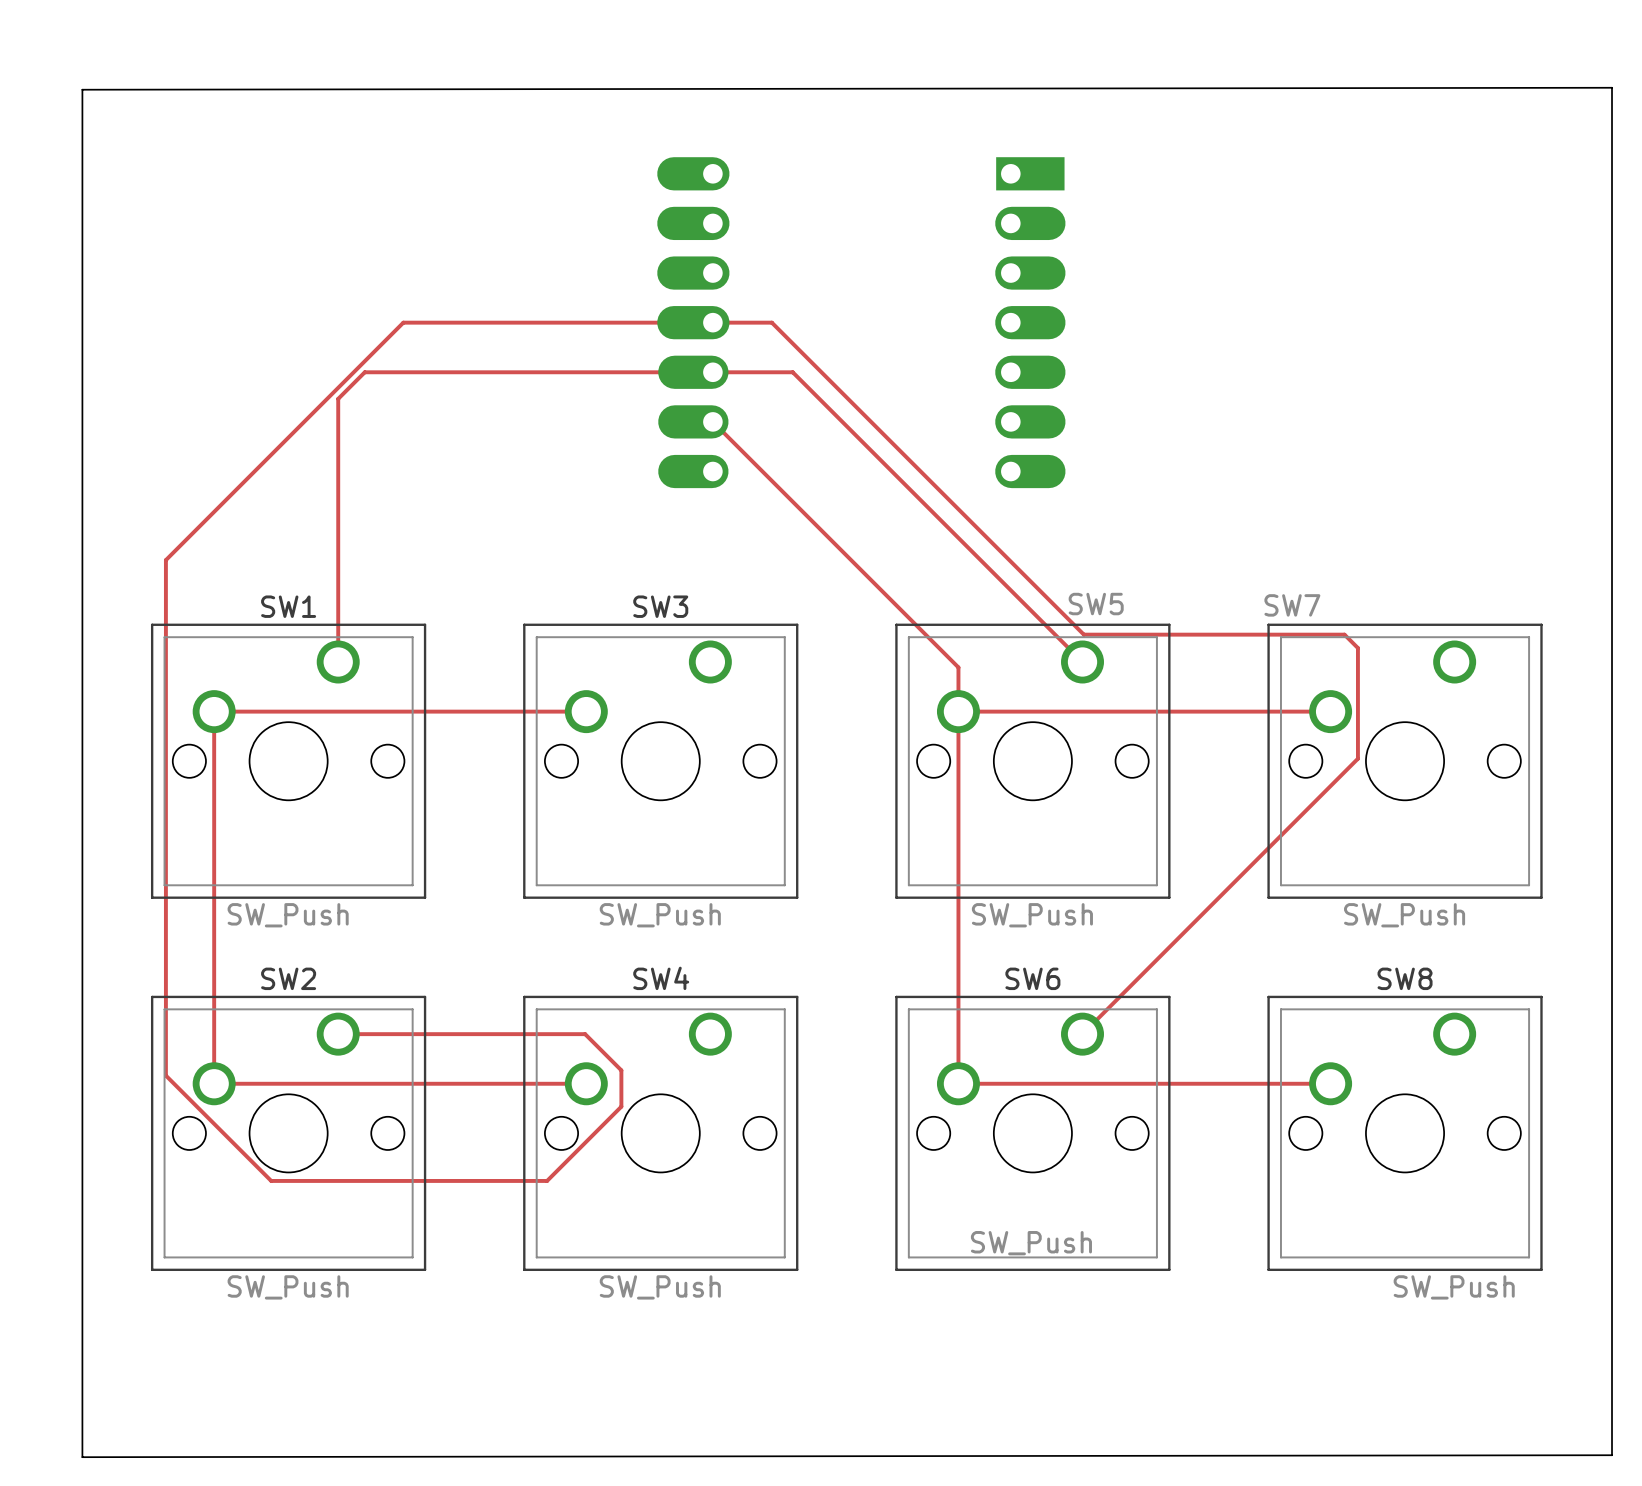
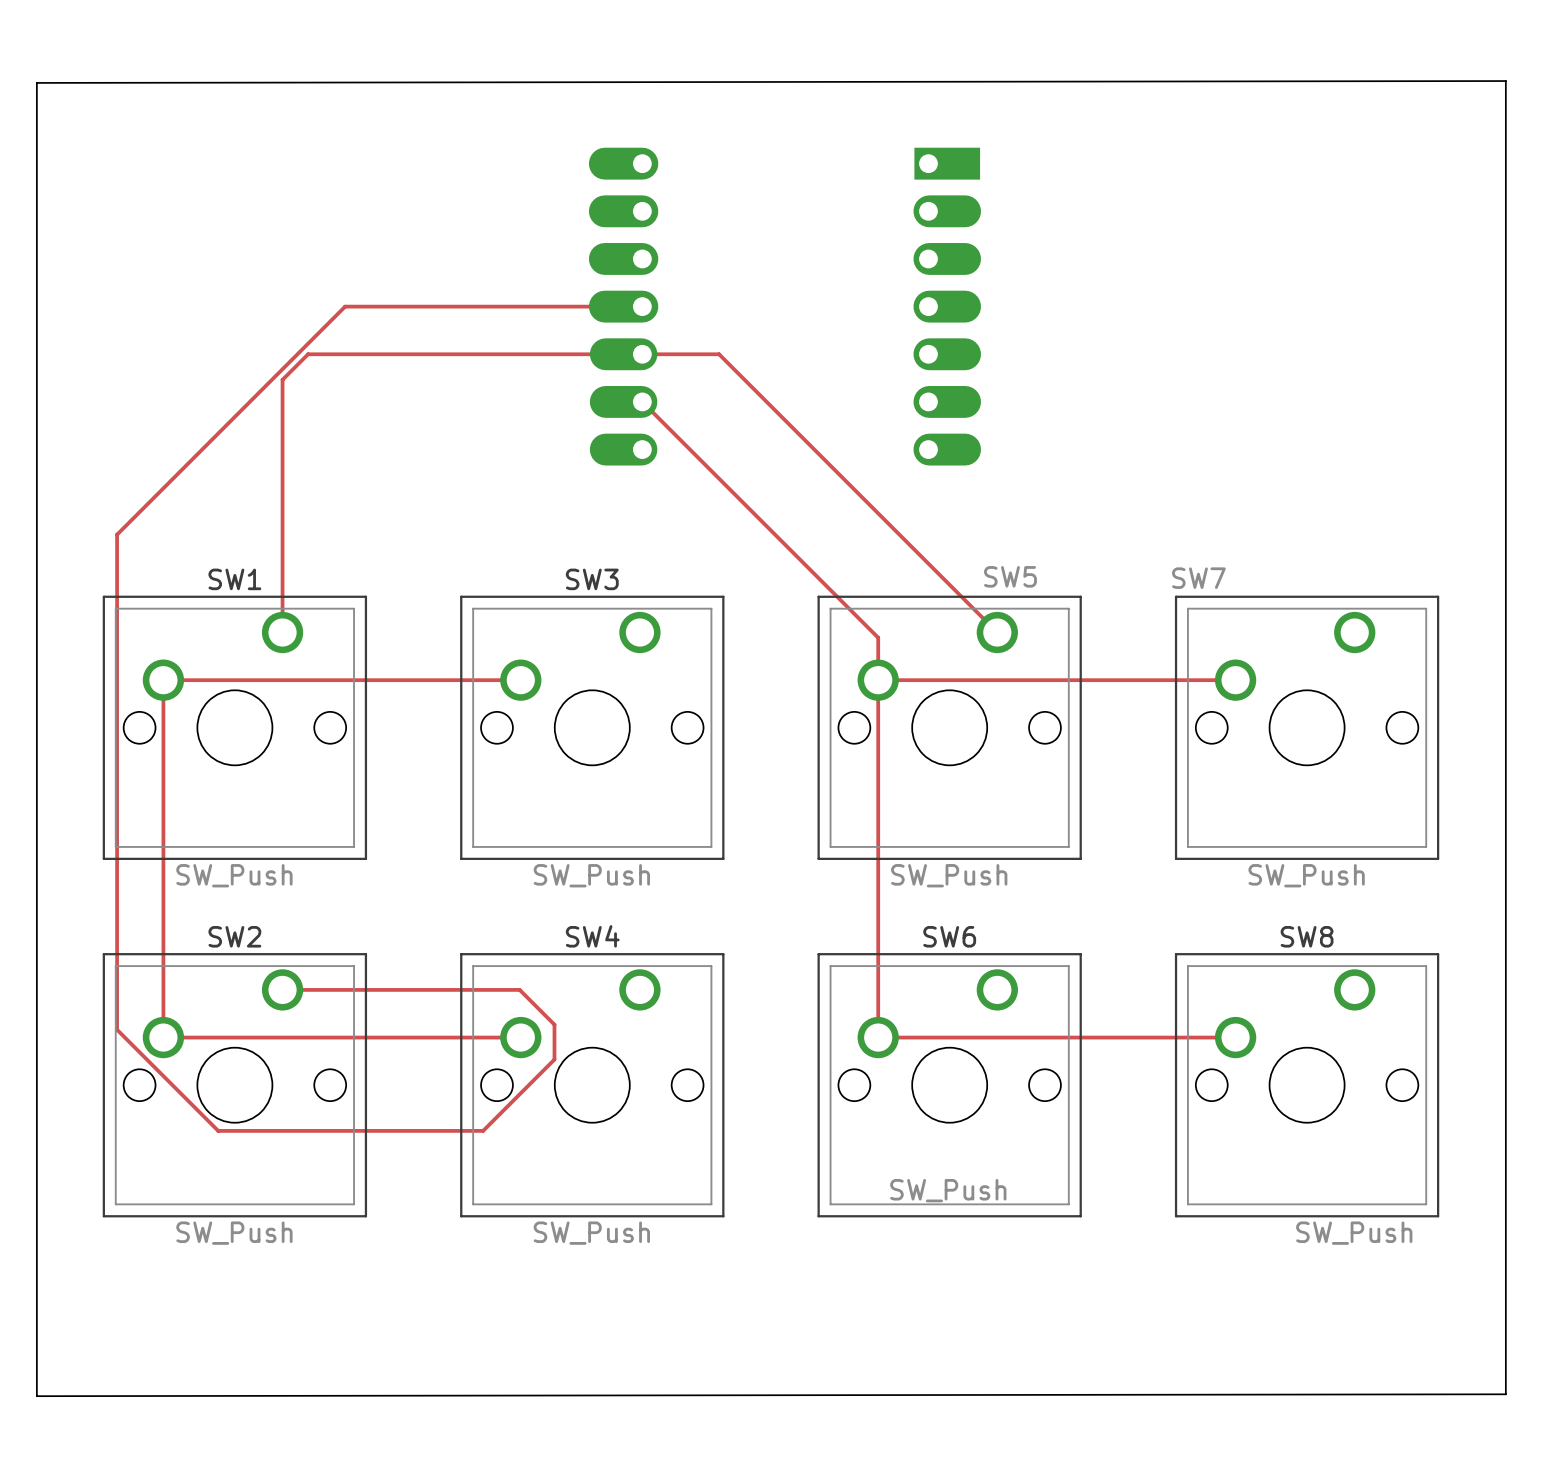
track: (712, 322) (771, 322) (1083, 634) (1344, 634) (1357, 648) (1357, 758) (1082, 1034) -> none

